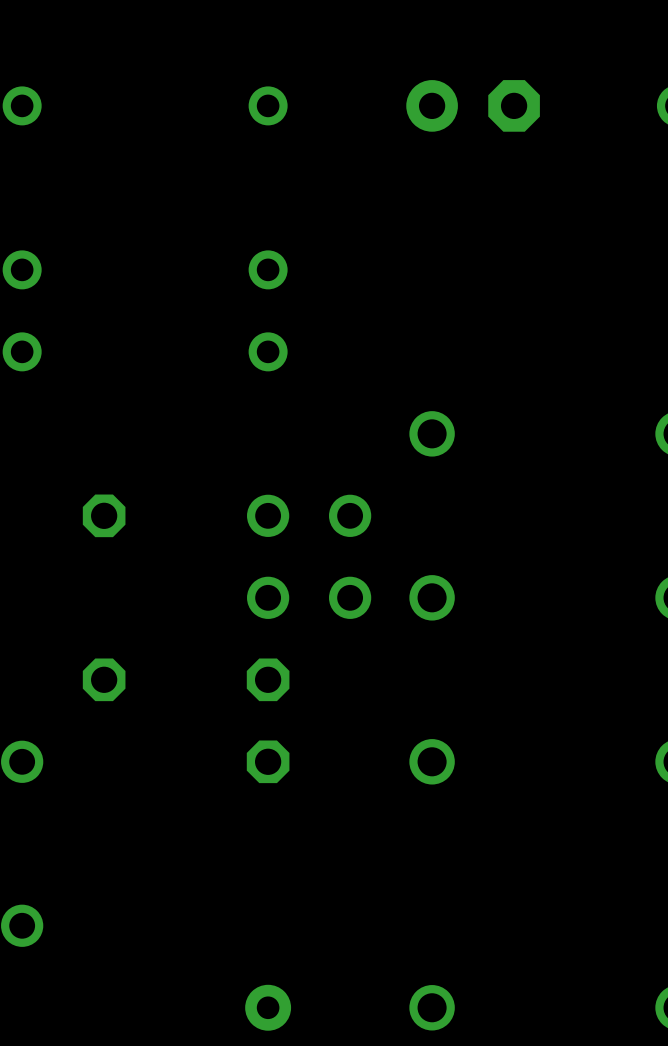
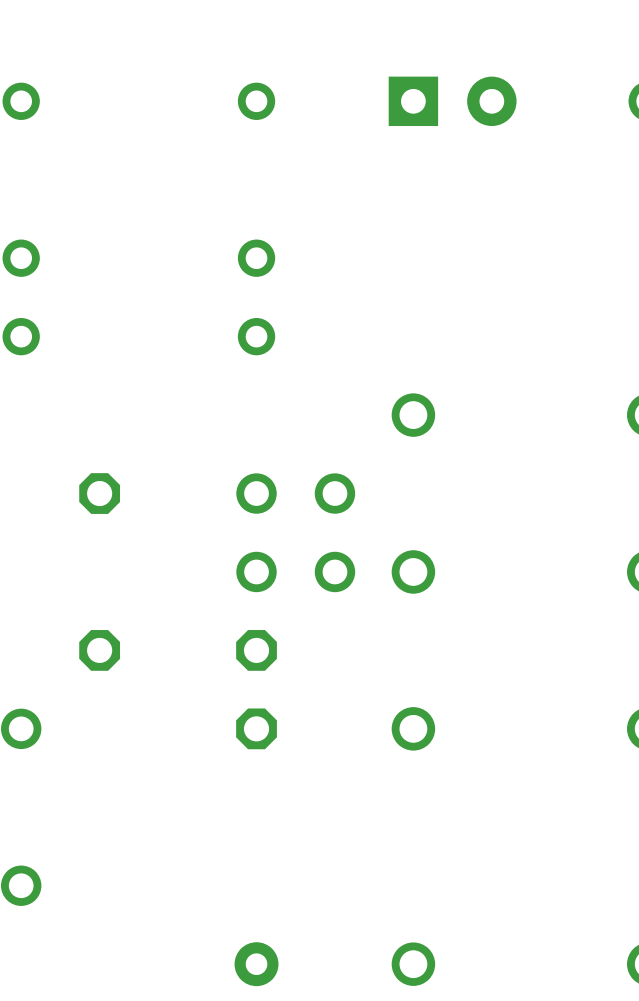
part footprint: [406, 80, 540, 132] -> [388, 76, 517, 127]

